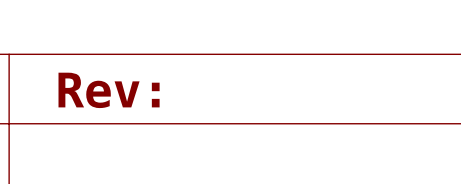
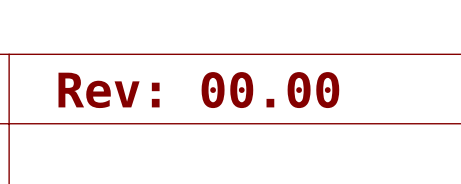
title block: Rev: (109, 90) -> Rev: 00.00 (198, 90)

